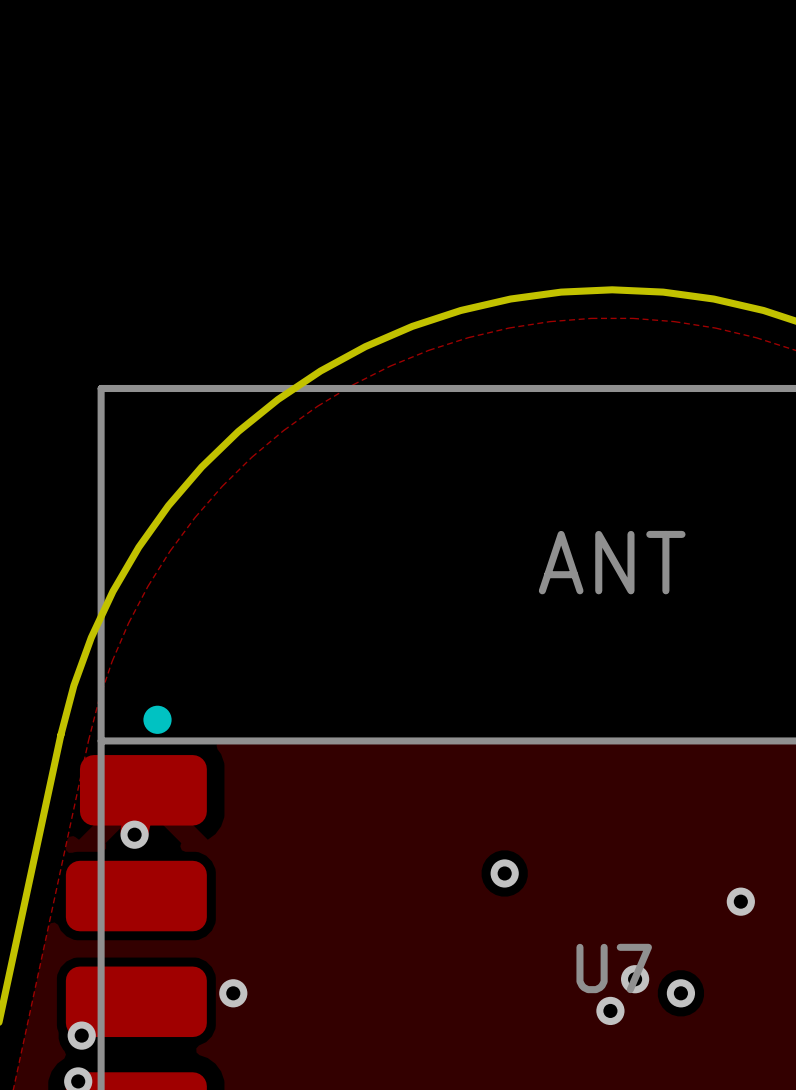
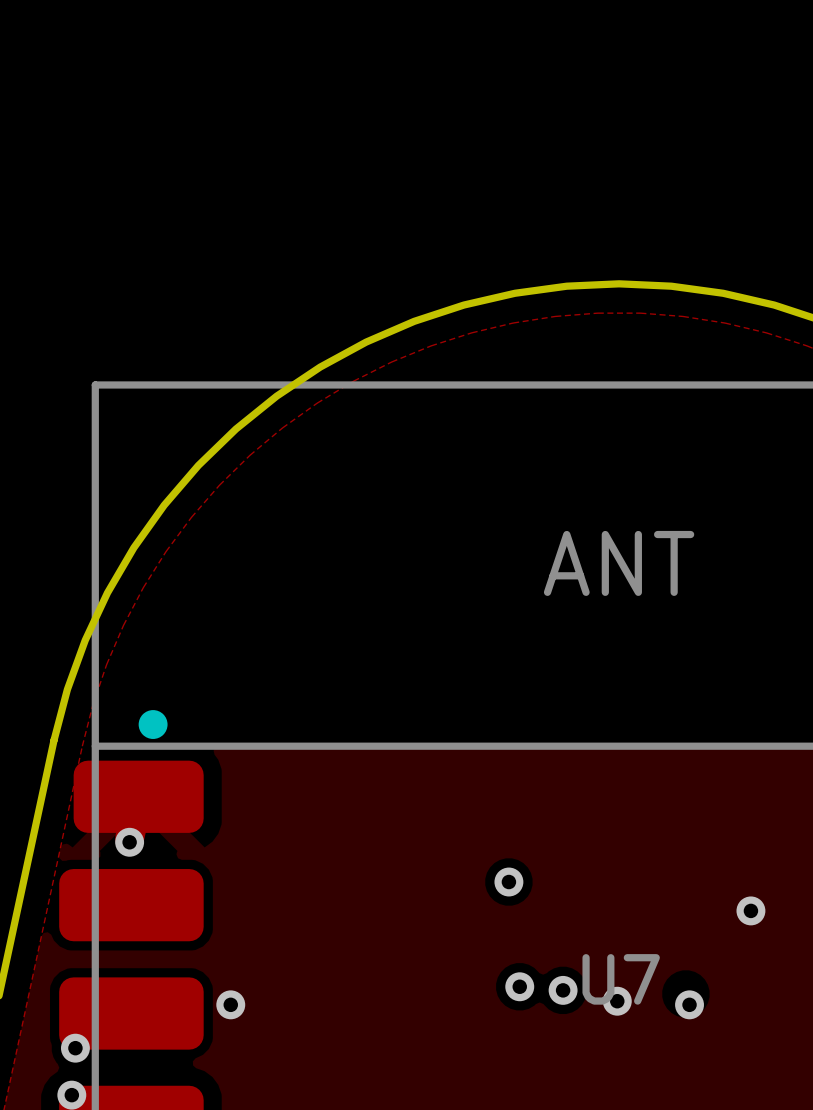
via: none -> (519, 986)
via: none -> (563, 990)
via: (635, 979) -> none
via: none -> (617, 1001)
via: (610, 1010) -> none

